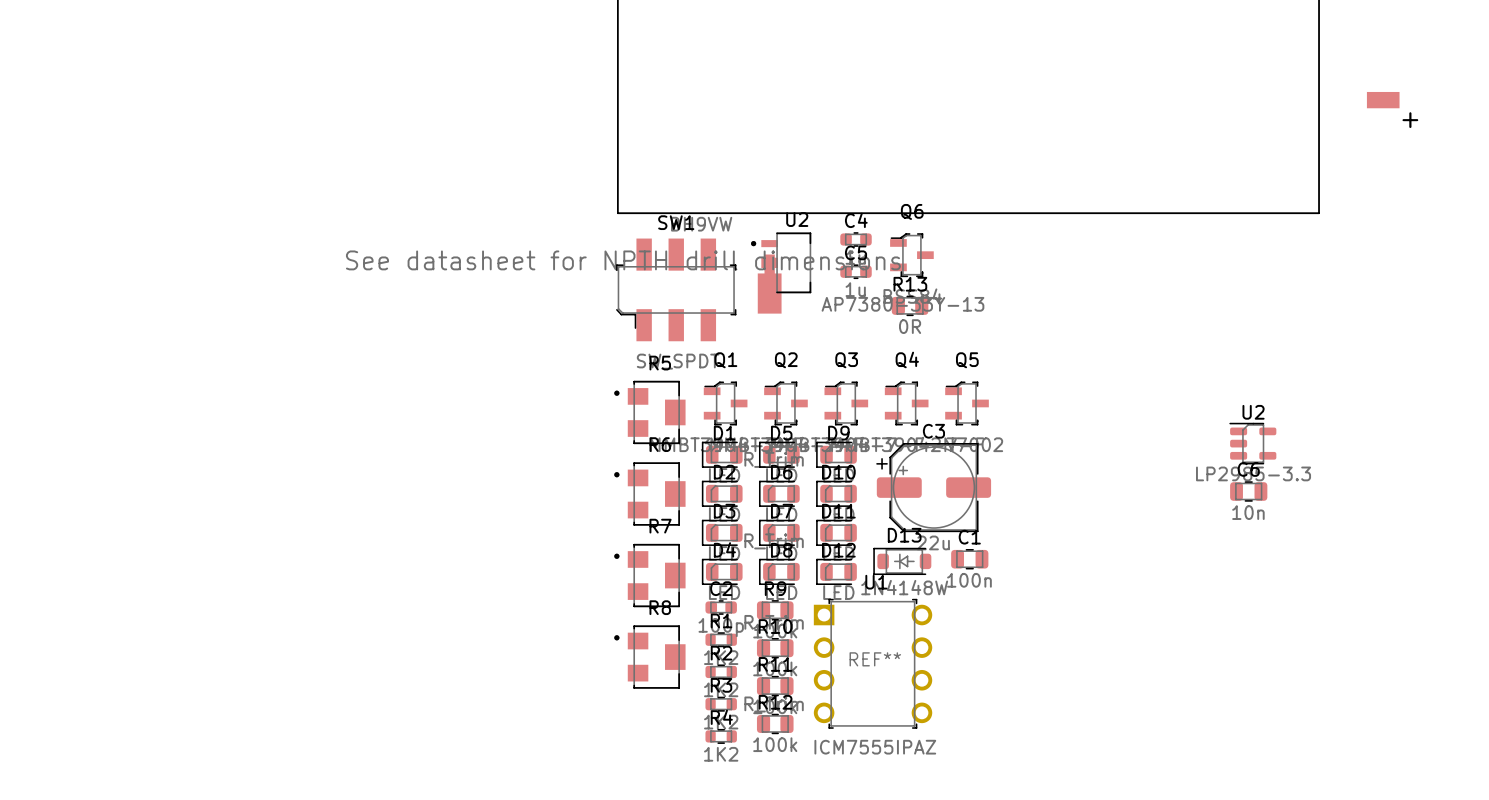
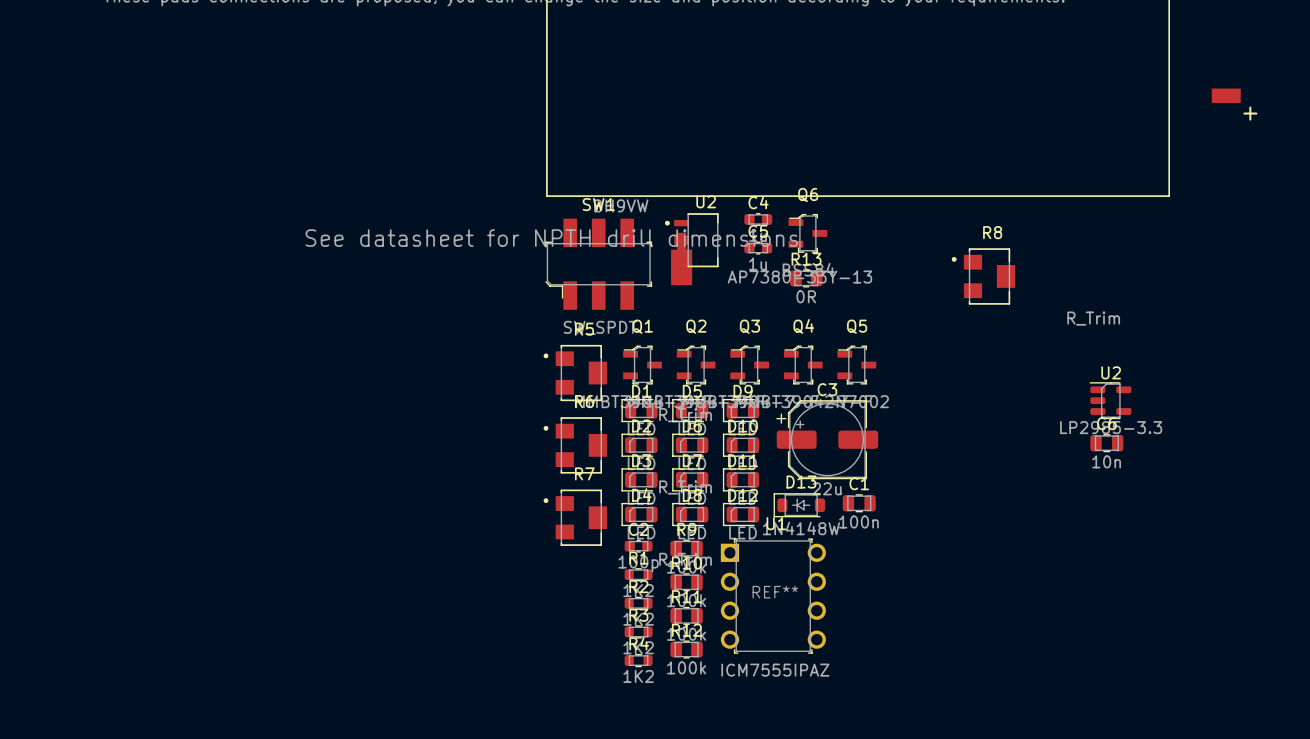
R8 position: (649, 657) -> (983, 276)

